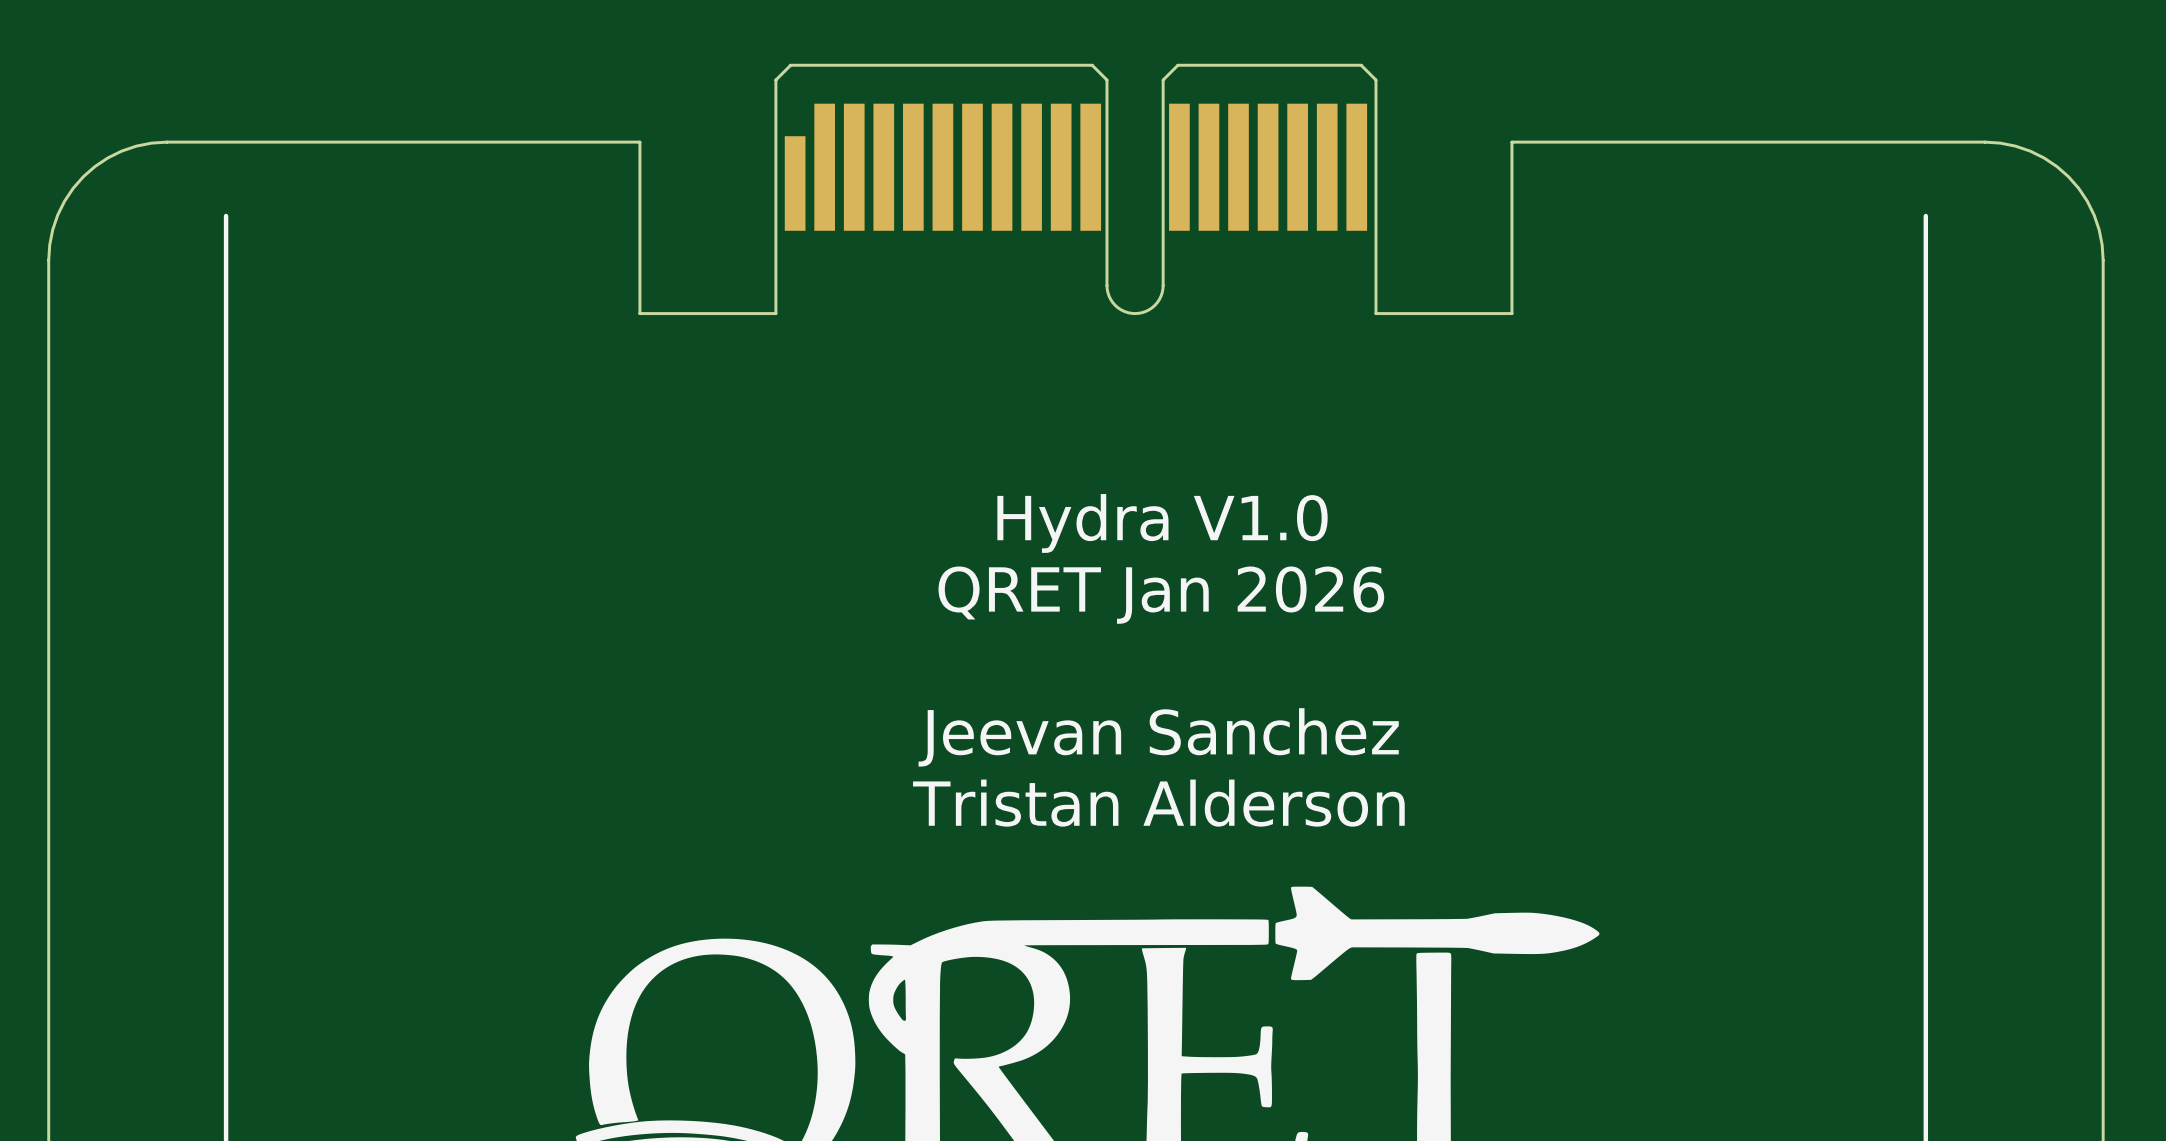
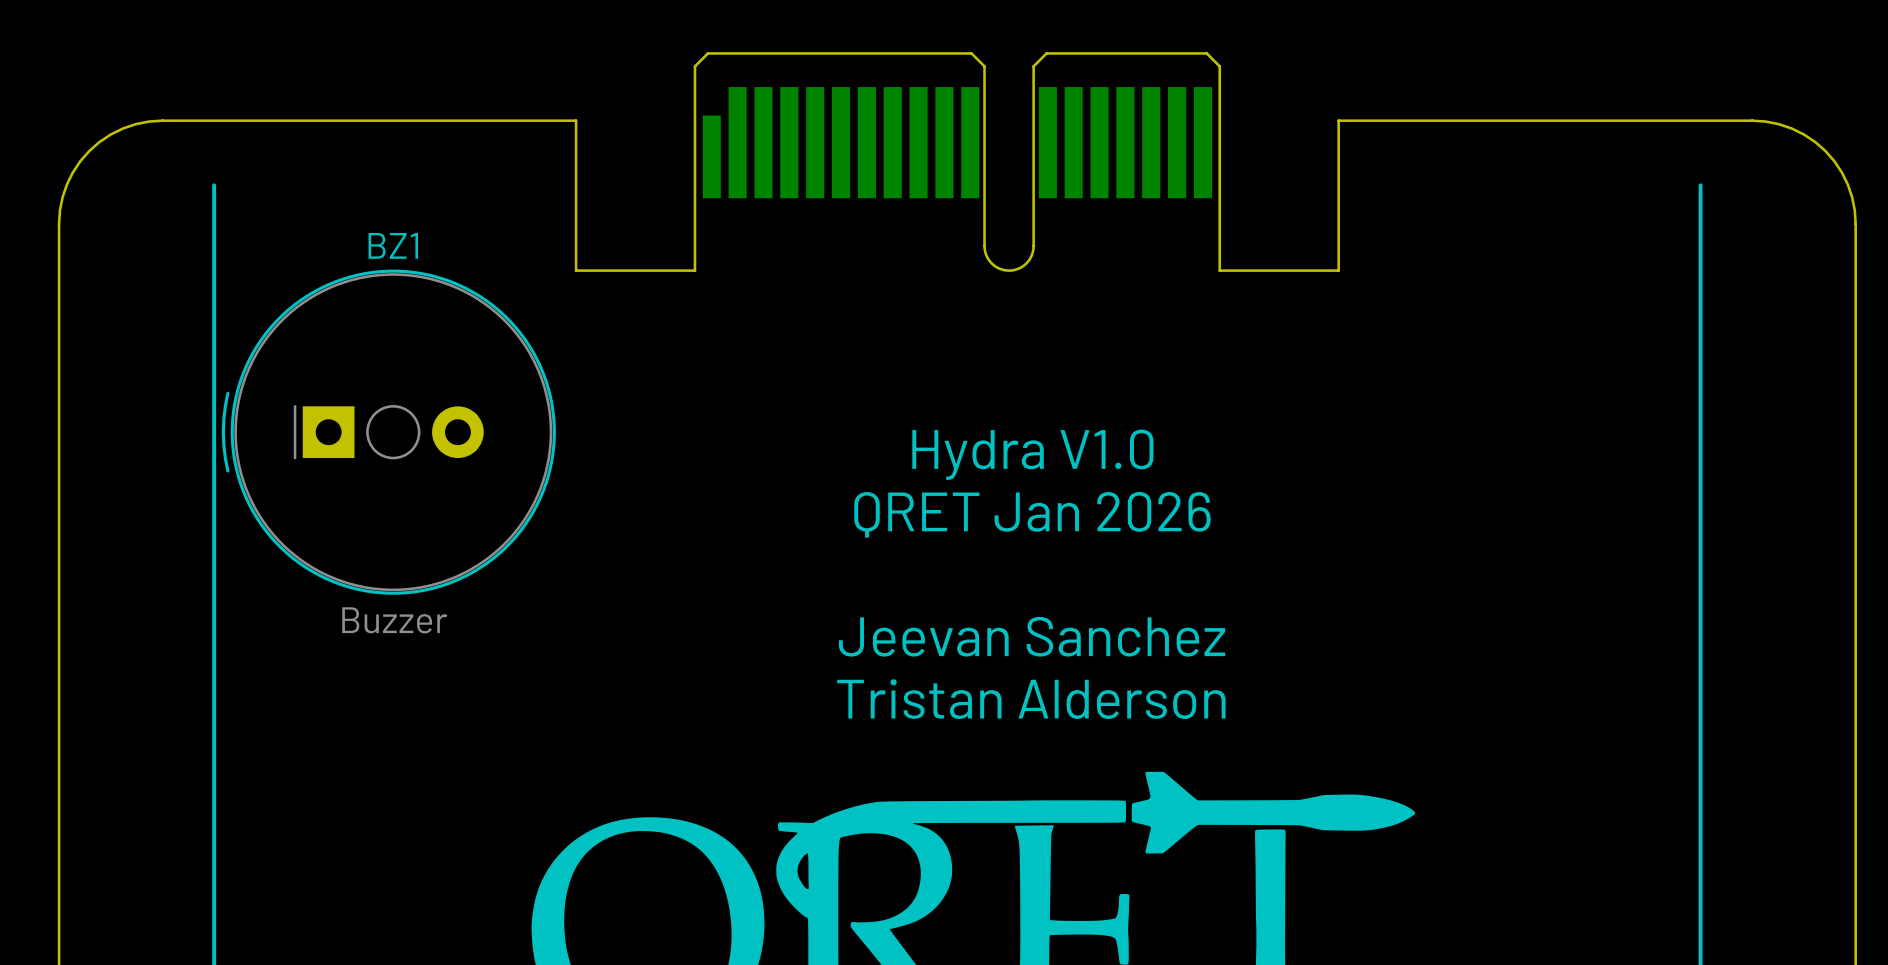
BZ1: none -> Buzzer (388, 432)

